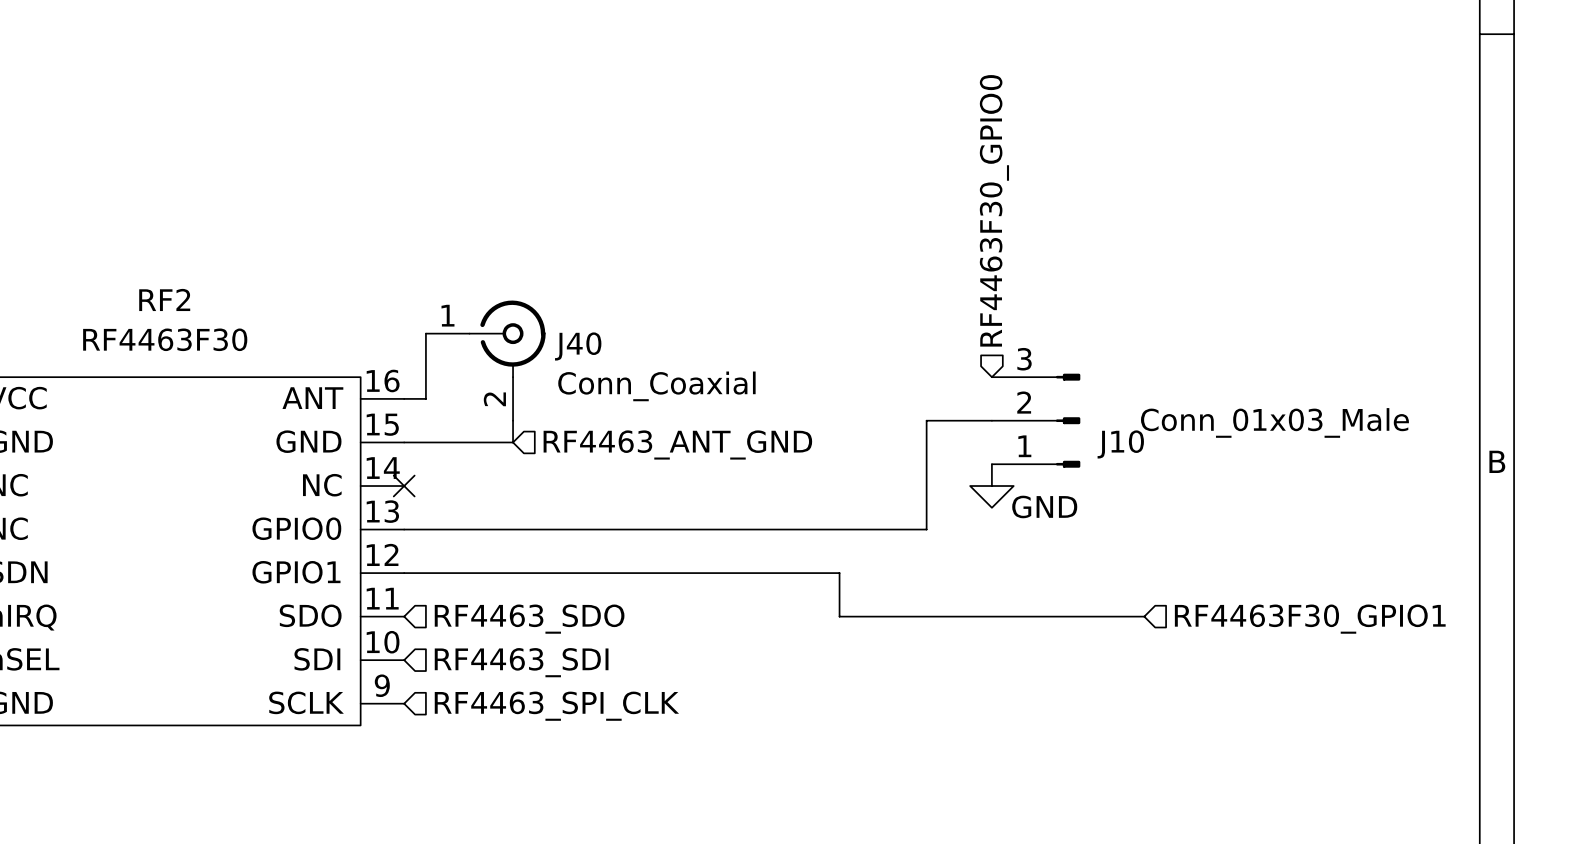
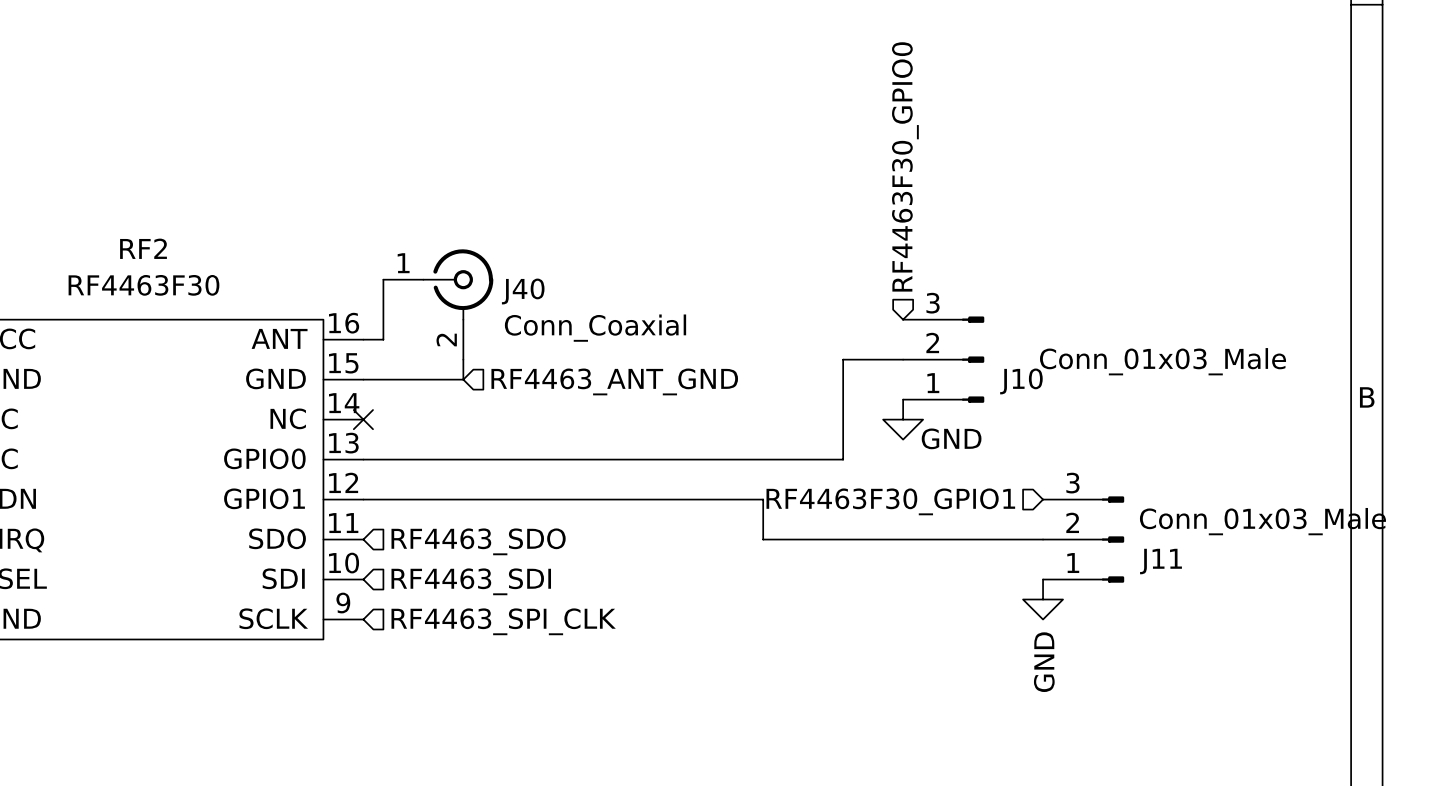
J11: none -> Conn_01x03_Male (1083, 539)
hierarchical label rotation: 0° (1310, 619) -> 180° (890, 501)
hierarchical label position: RF4463F30_GPIO1 (1310, 619) -> RF4463F30_GPIO1 (890, 501)
power symbol: none -> GND (1043, 599)

